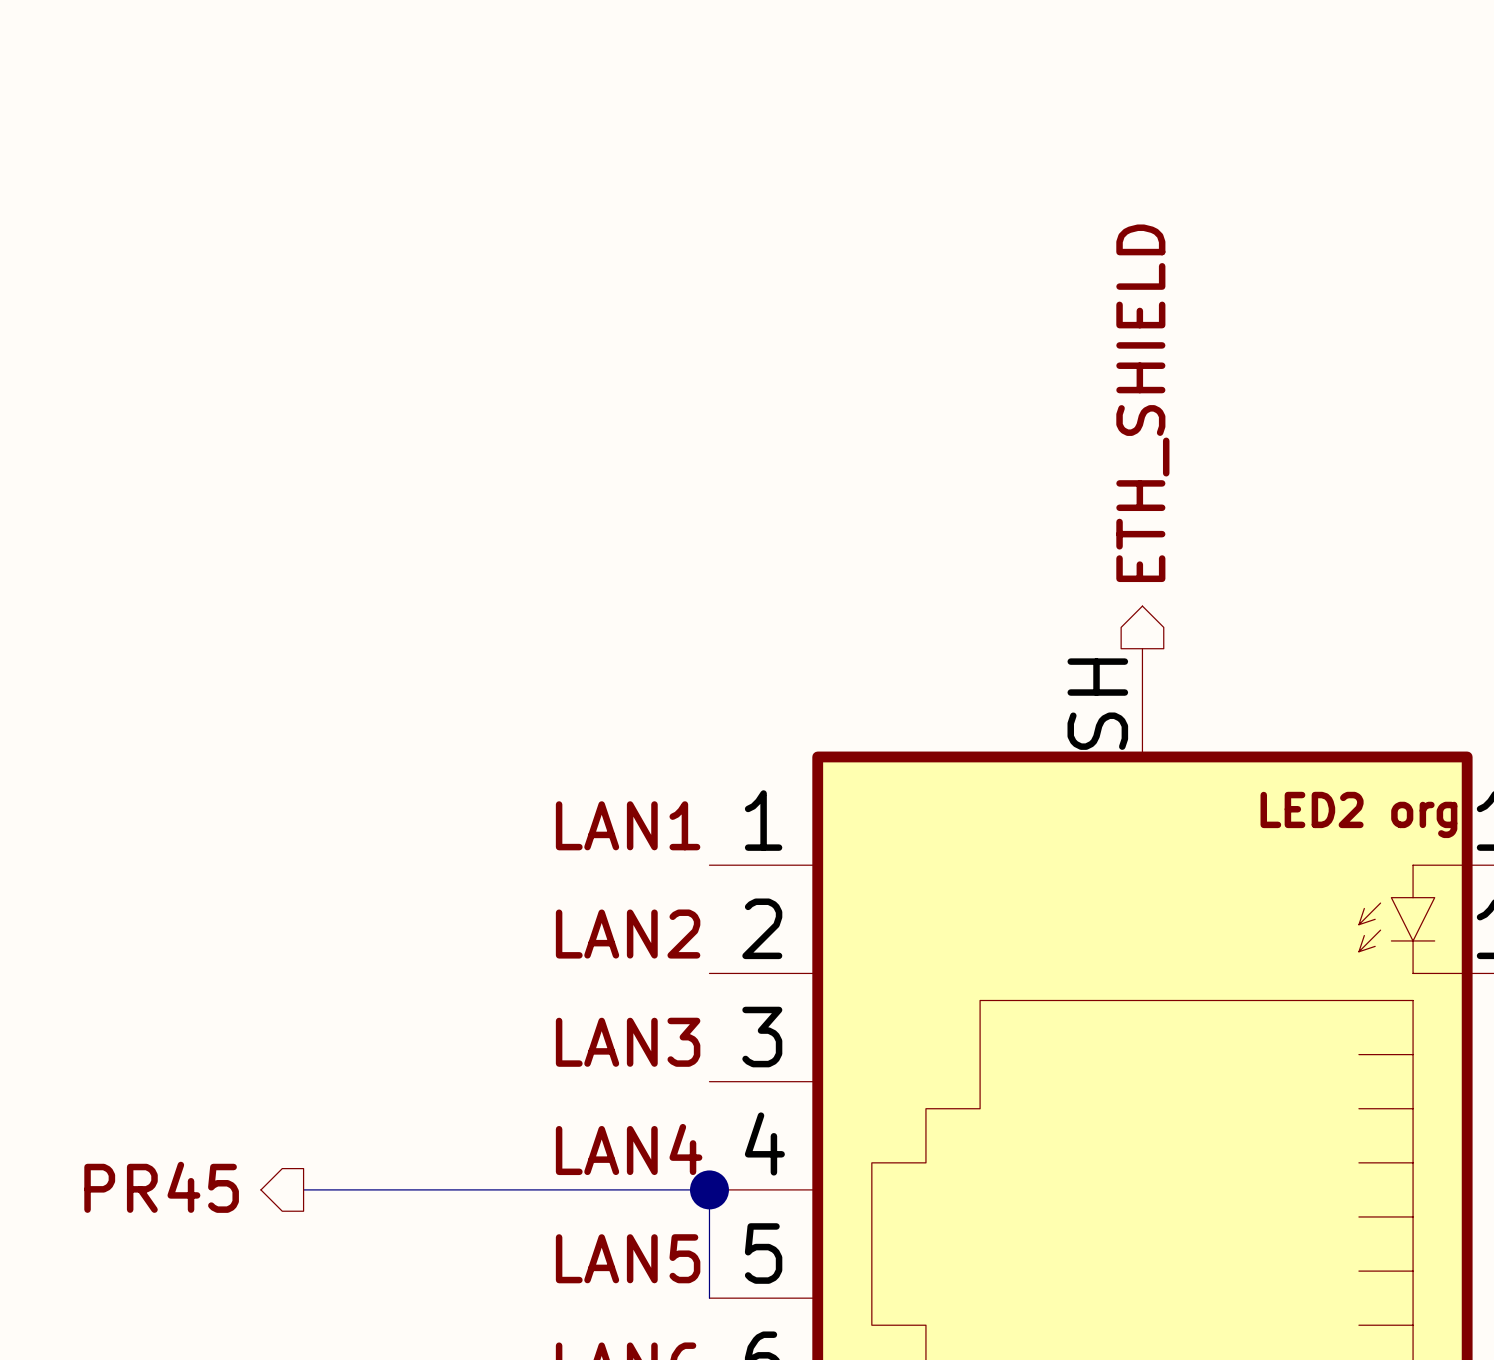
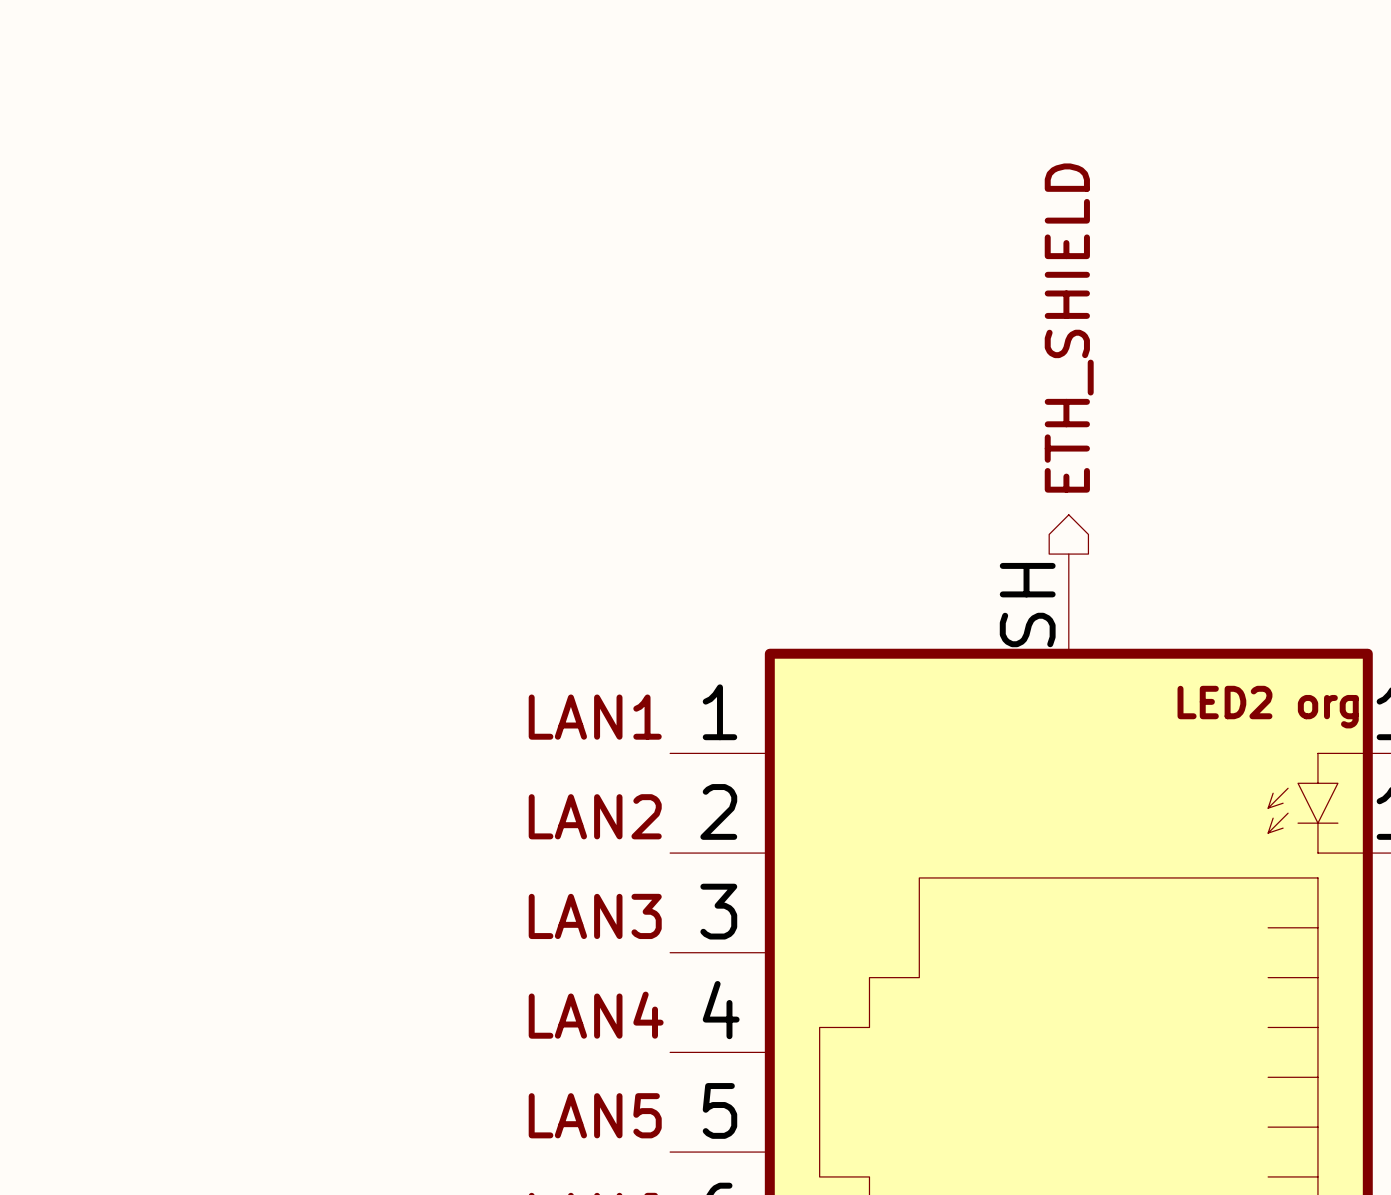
hierarchical label: PR45 (161, 1187) -> none
wire: (303, 1189) (709, 1189) (709, 1298) -> none
junction: (709, 1189) -> none

